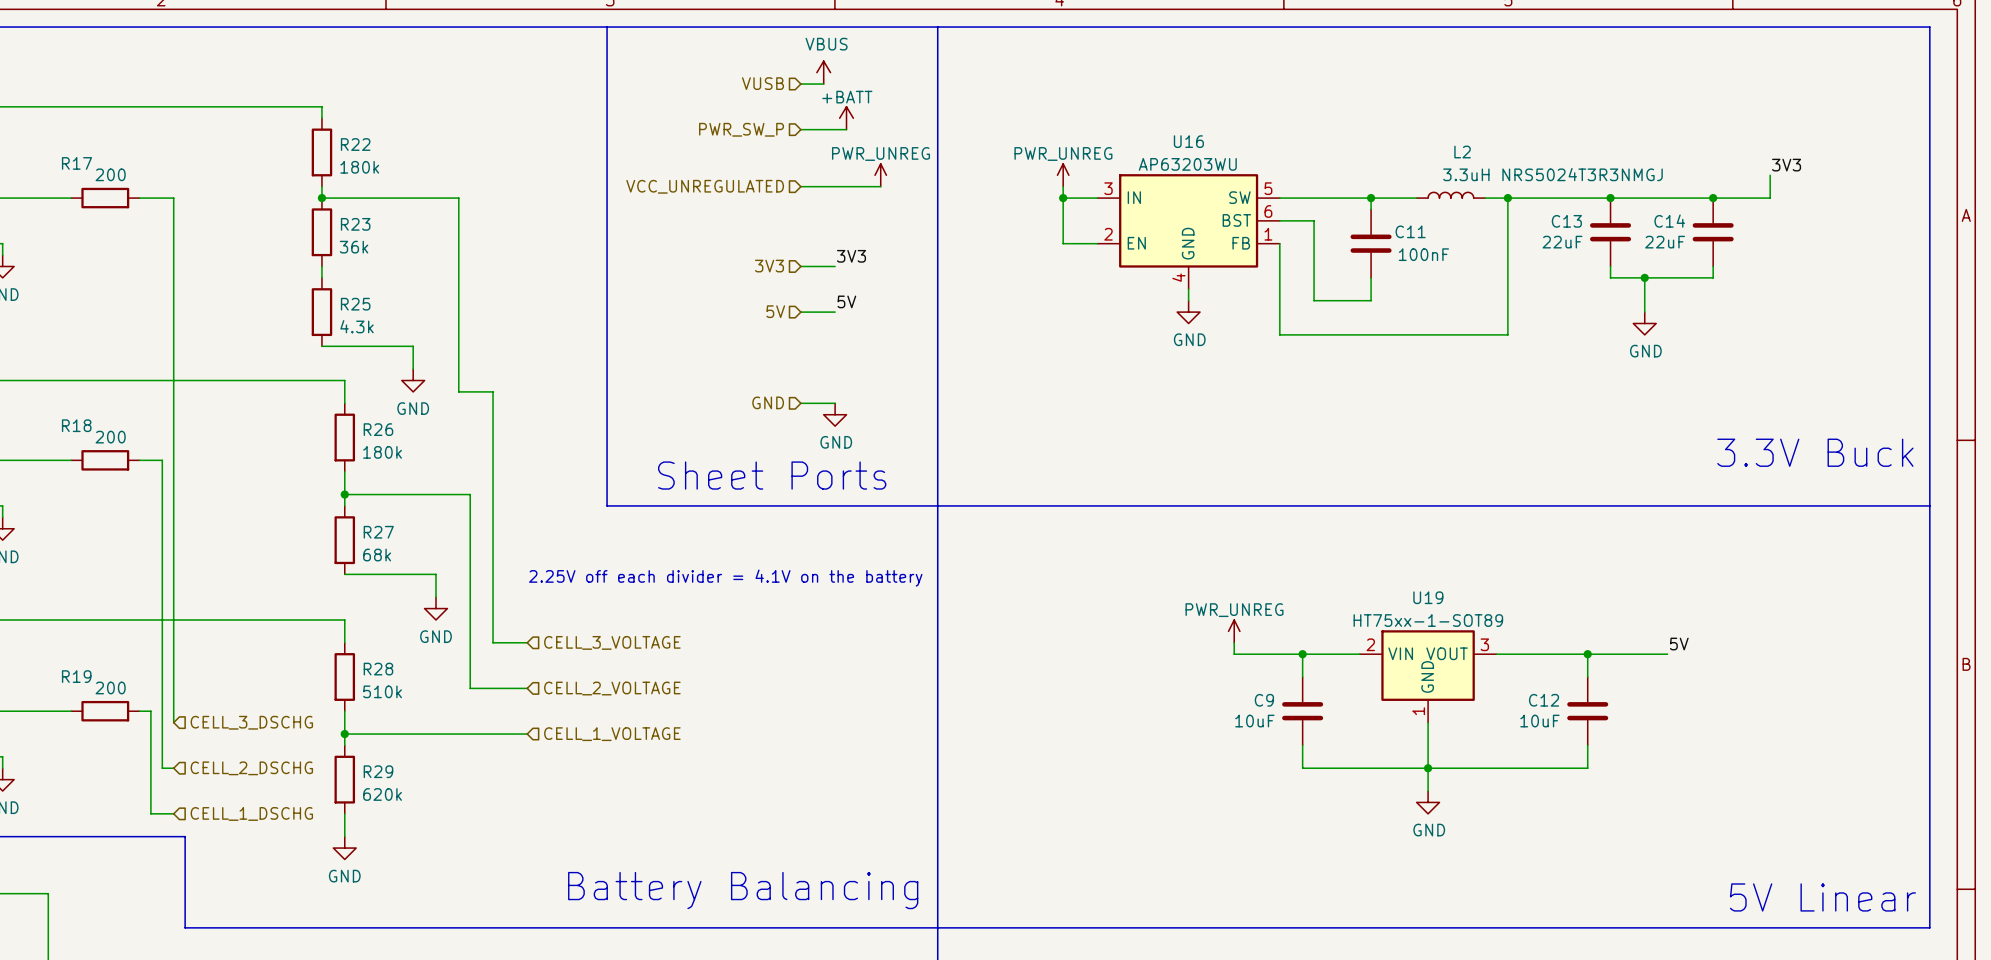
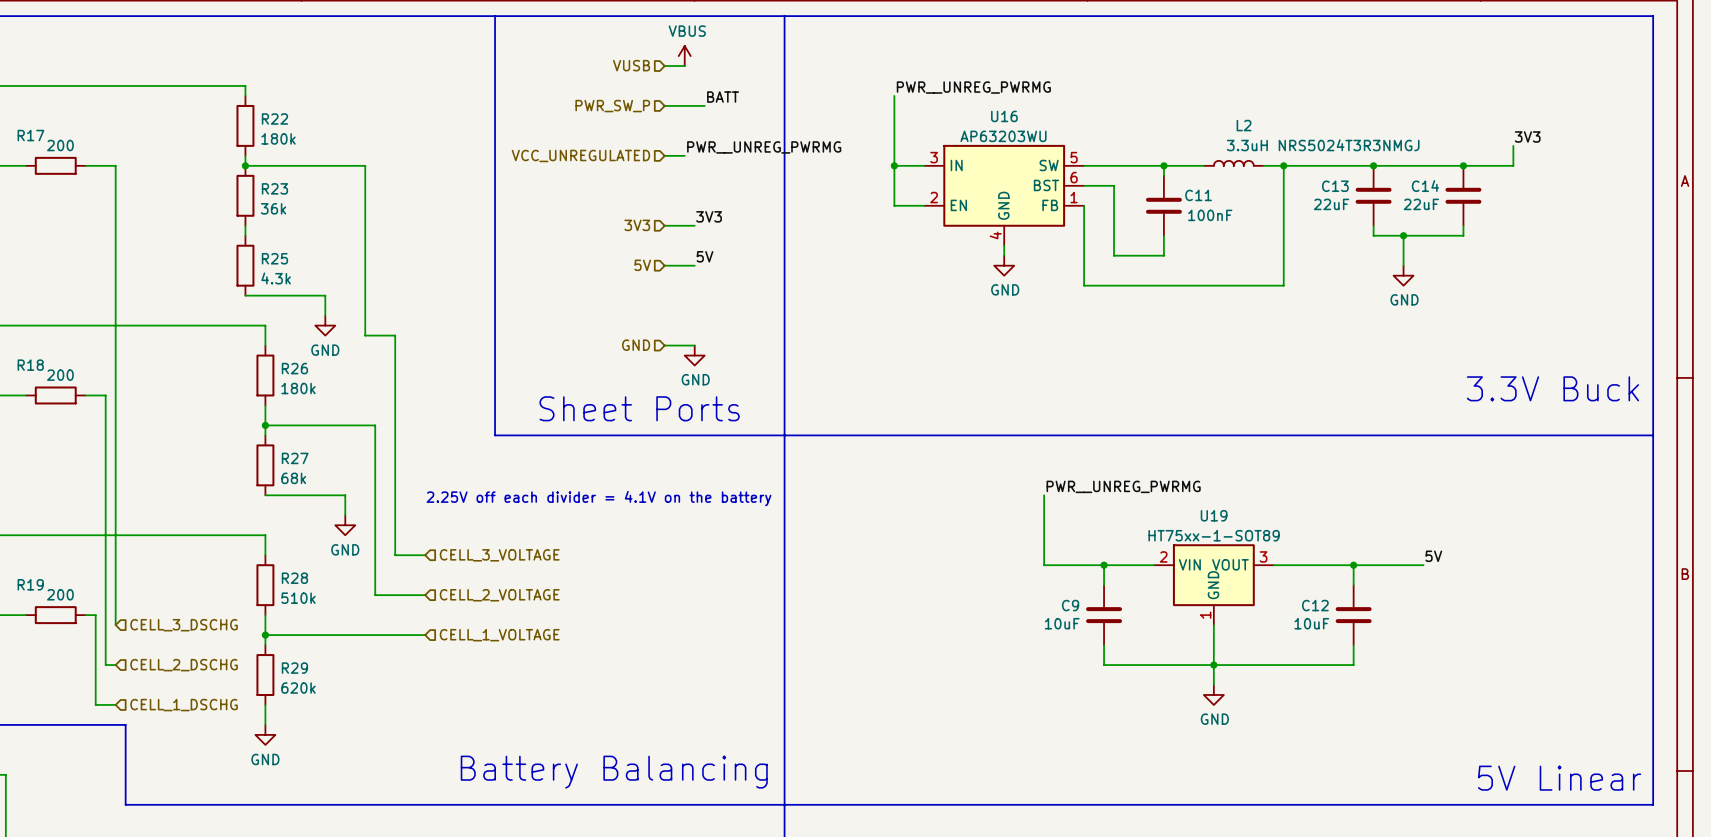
label: none -> PWR__UNREG_PWRMG (973, 87)
power symbol: +BATT (846, 118) -> none
wire: none -> (894, 95) (894, 155)
label: none -> BATT (723, 97)
power symbol: PWR_UNREG (880, 175) -> none
power symbol: PWR_UNREG (1063, 175) -> none
label: none -> PWR__UNREG_PWRMG (764, 147)
wire: (823, 186) (880, 186) -> none
label: none -> PWR__UNREG_PWRMG (1123, 486)
wire: none -> (1044, 495) (1044, 555)
power symbol: PWR_UNREG (1234, 631) -> none

